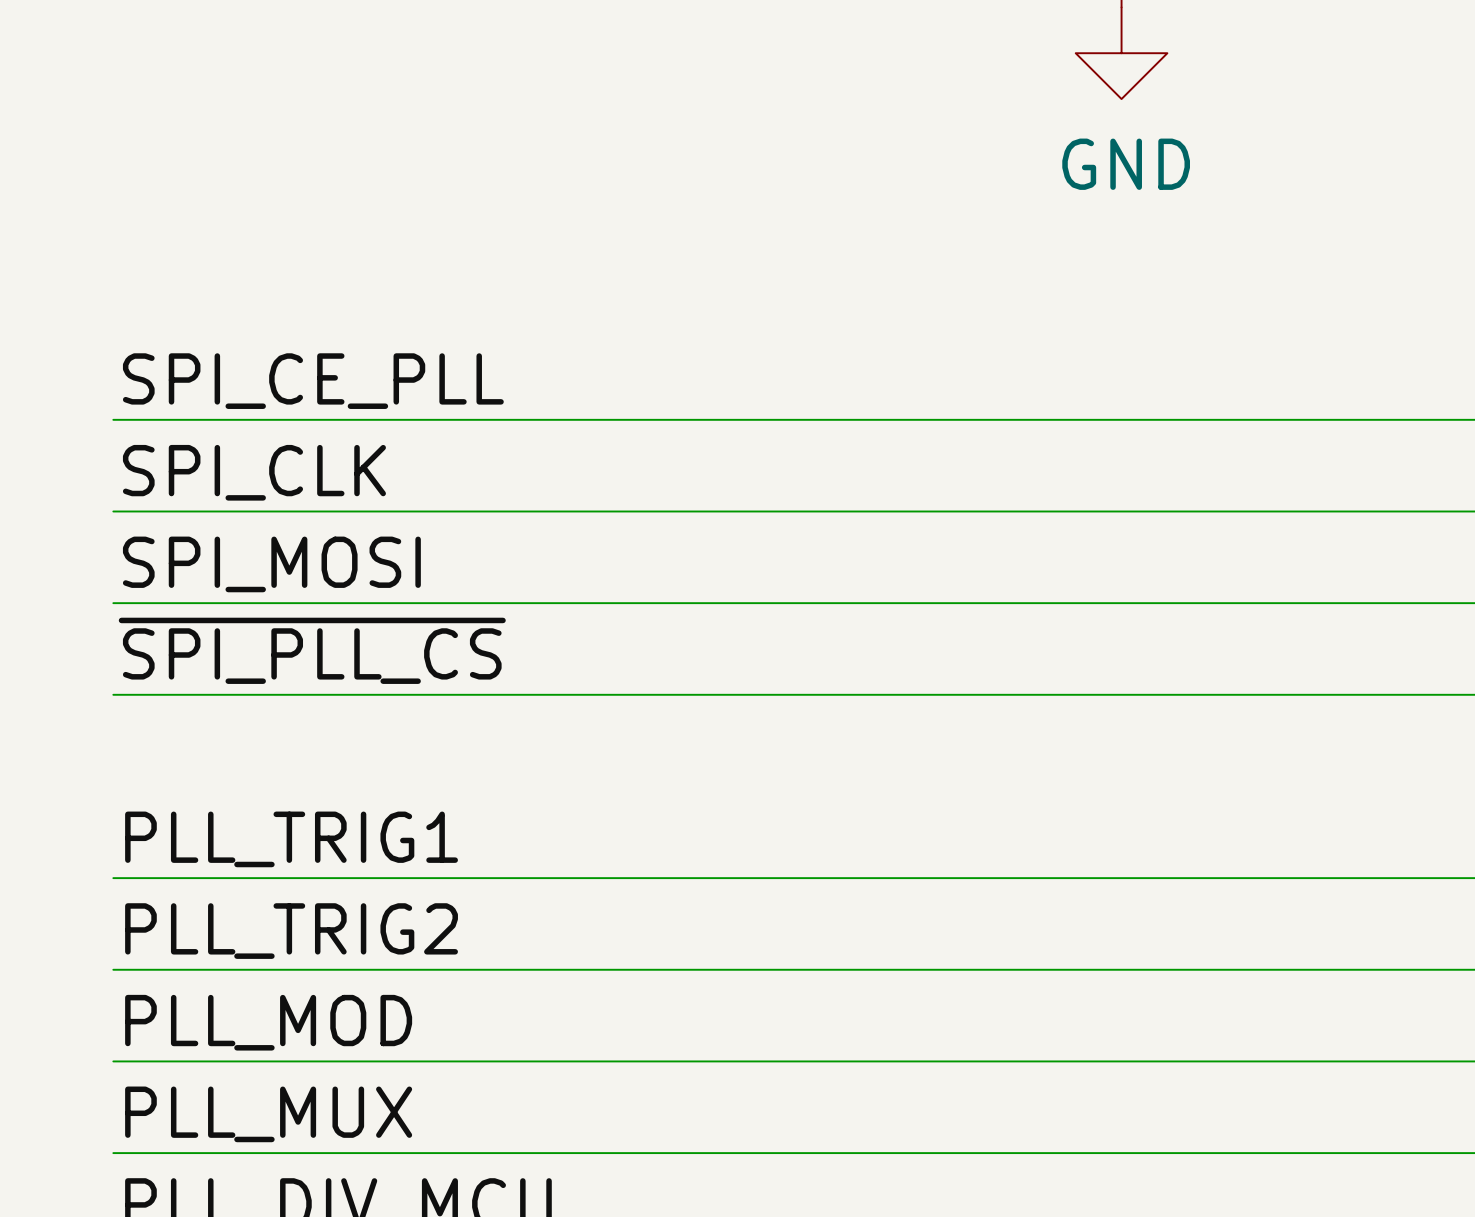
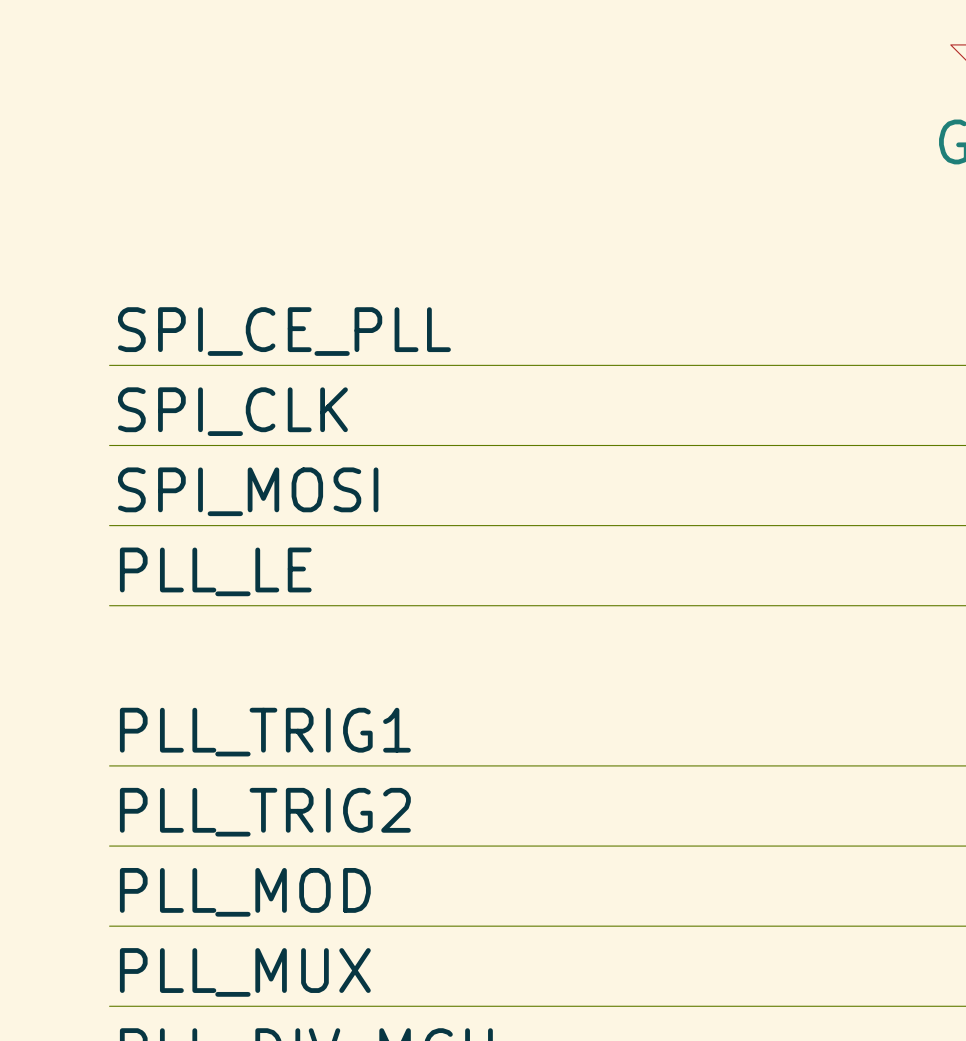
label: ~{SPI_PLL_CS} (312, 650) -> PLL_LE (215, 571)

